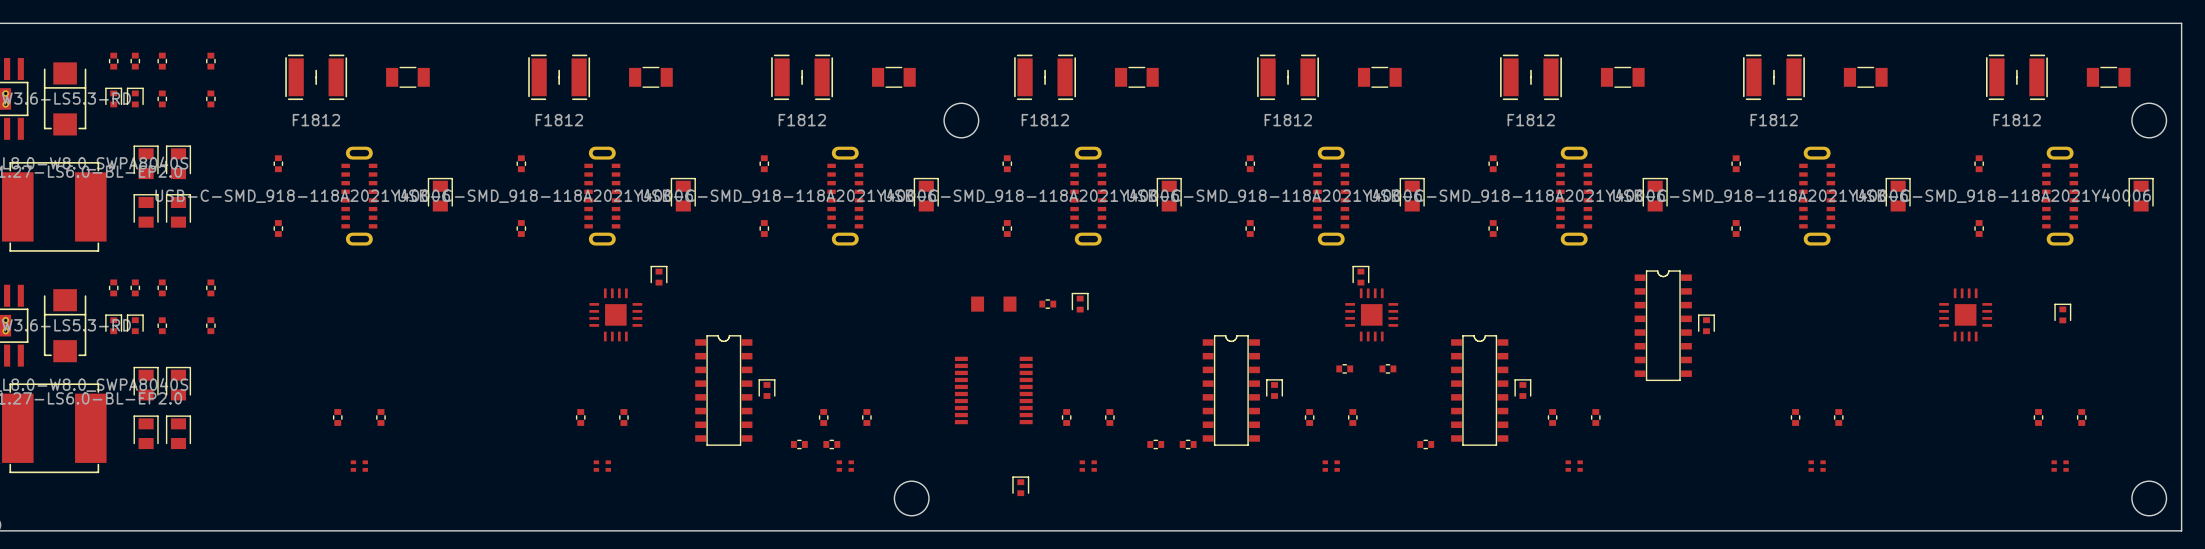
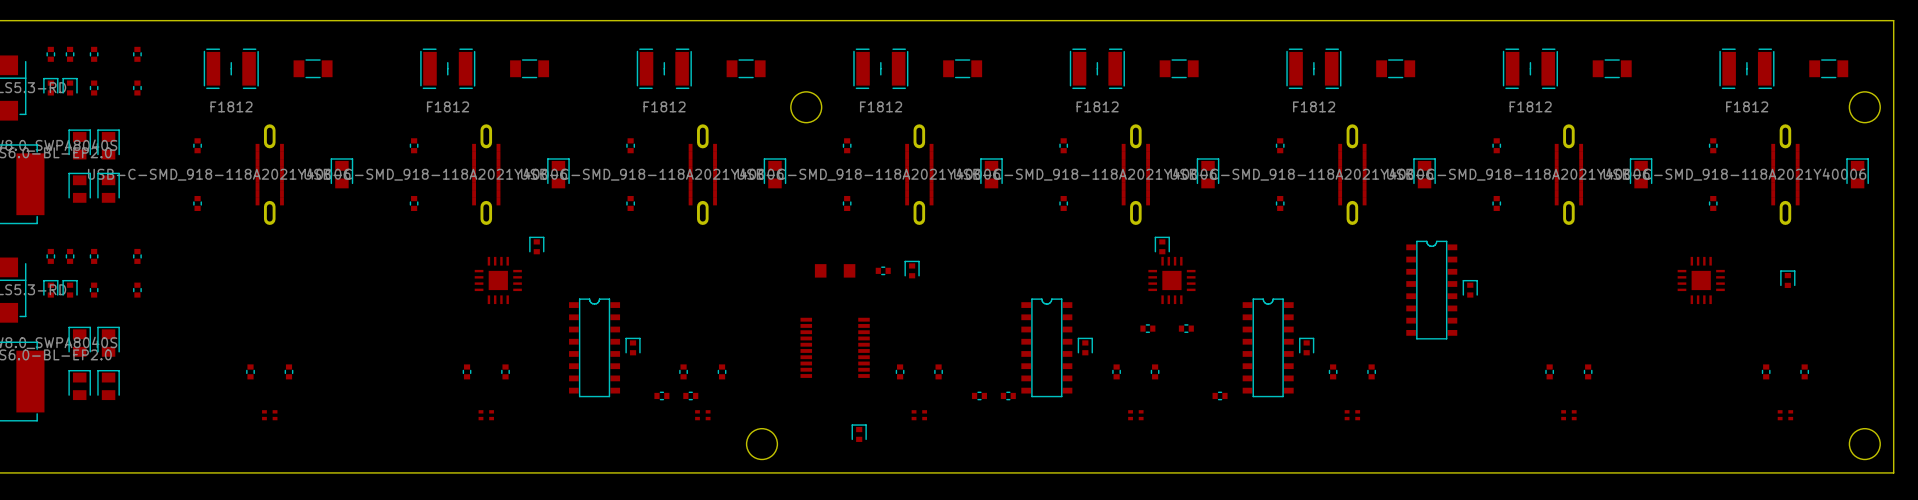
part footprint: [341, 146, 378, 246] -> [255, 124, 284, 225]
part footprint: [584, 146, 621, 246] -> [472, 124, 501, 225]
part footprint: [827, 146, 864, 246] -> [688, 124, 717, 225]
part footprint: [1070, 146, 1107, 246] -> [905, 124, 934, 225]
part footprint: [1313, 146, 1350, 246] -> [1121, 124, 1151, 225]
part footprint: [1556, 146, 1593, 246] -> [1338, 124, 1367, 225]
part footprint: [1799, 146, 1836, 246] -> [1554, 124, 1584, 225]
part footprint: [2042, 146, 2079, 246] -> [1771, 124, 1800, 225]

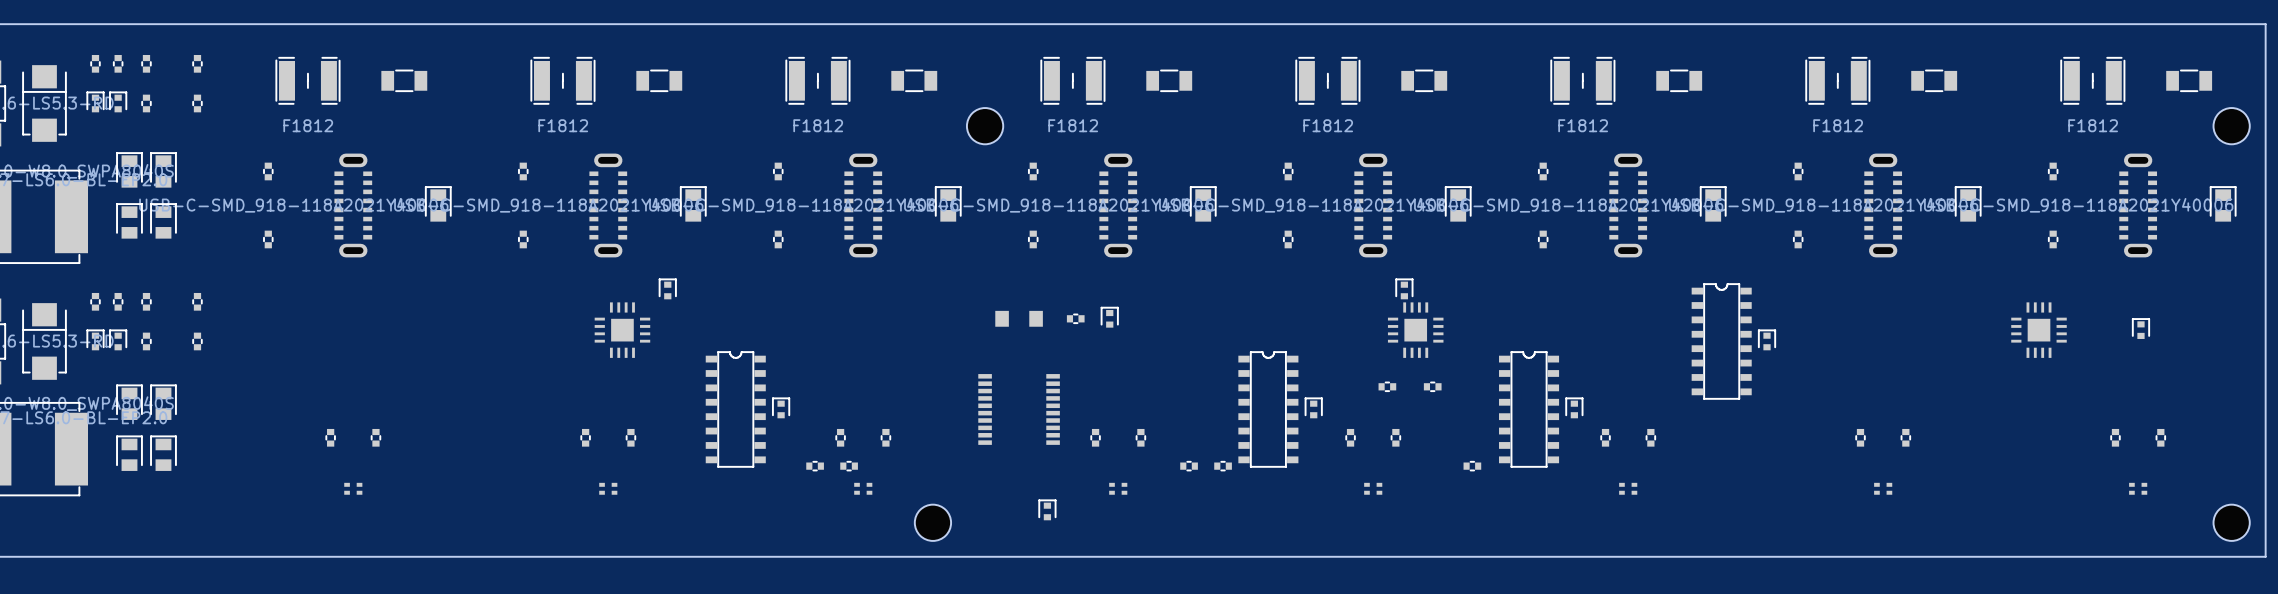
part footprint: [255, 124, 284, 225] -> [334, 153, 373, 258]
part footprint: [472, 124, 501, 225] -> [589, 153, 628, 258]
part footprint: [688, 124, 717, 225] -> [844, 153, 883, 258]
part footprint: [905, 124, 934, 225] -> [1099, 153, 1138, 258]
part footprint: [1121, 124, 1151, 225] -> [1354, 153, 1393, 258]
part footprint: [1338, 124, 1367, 225] -> [1609, 153, 1648, 258]
part footprint: [1554, 124, 1584, 225] -> [1864, 153, 1903, 258]
part footprint: [1771, 124, 1800, 225] -> [2119, 153, 2158, 258]

